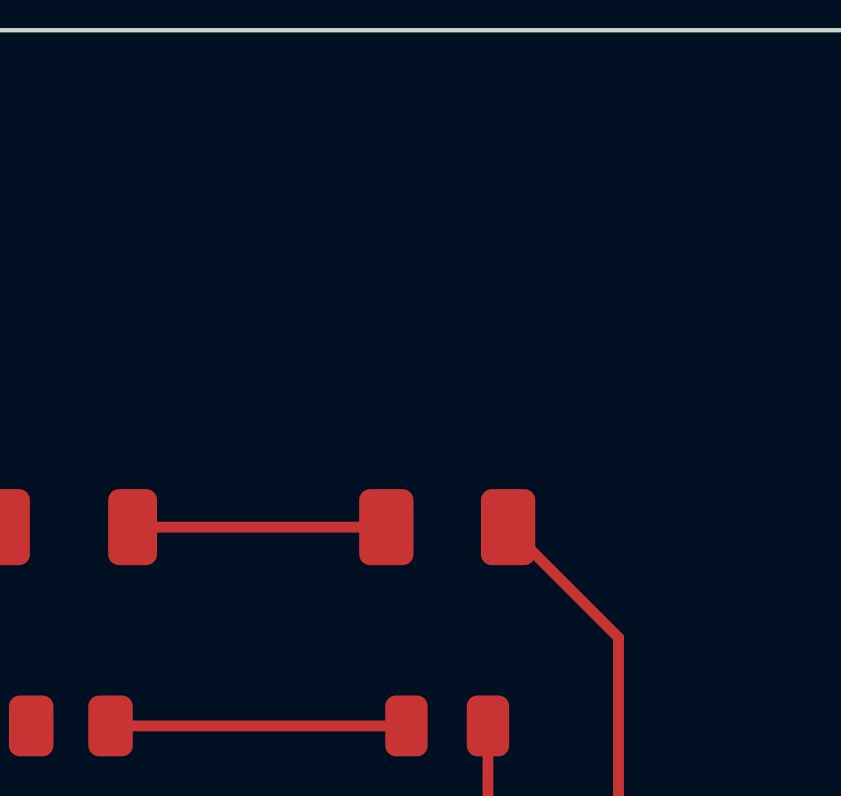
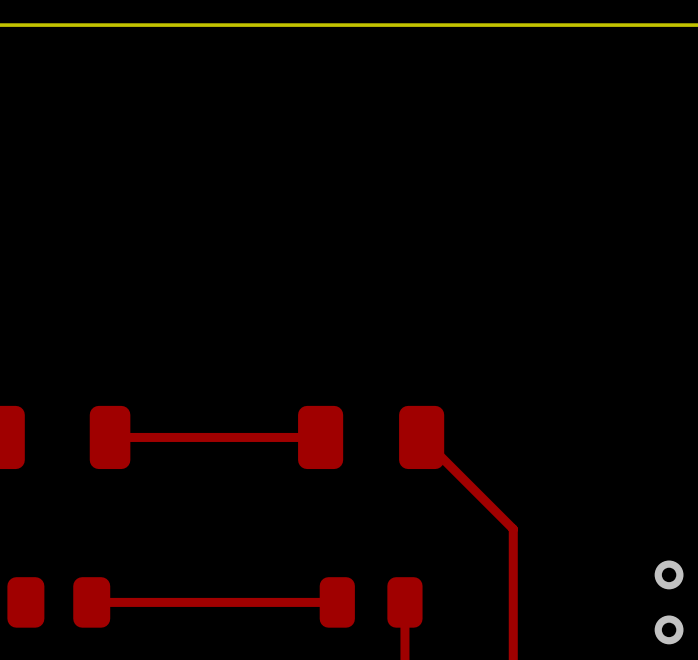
via: none -> (669, 574)
via: none -> (669, 629)

